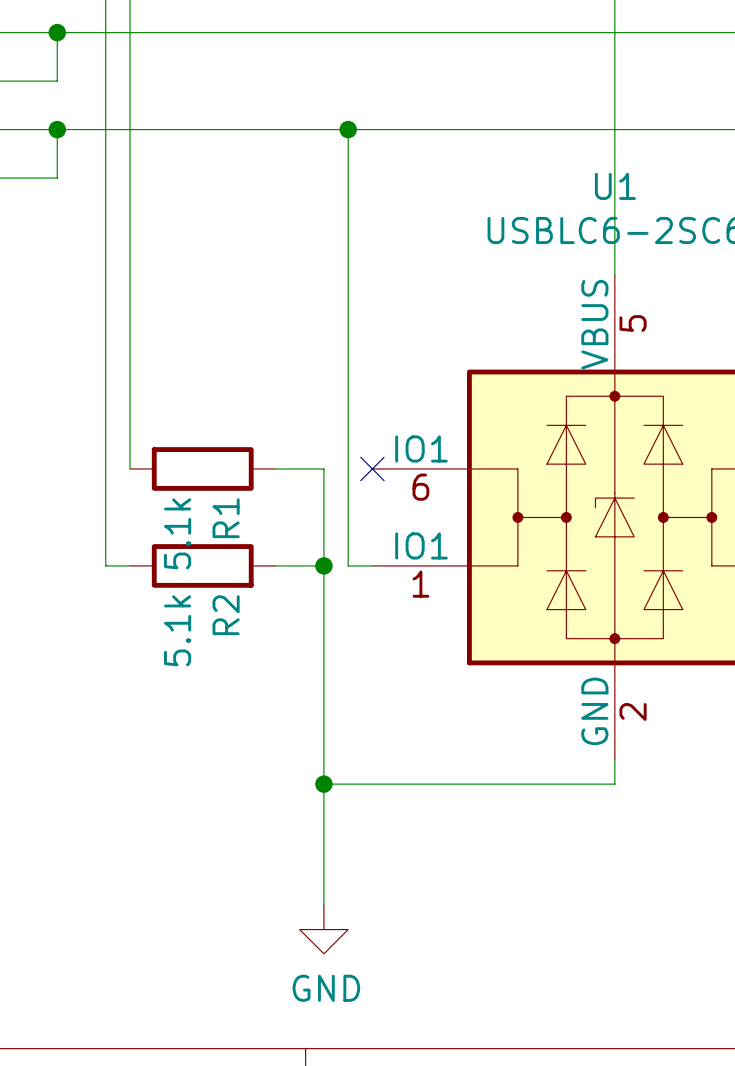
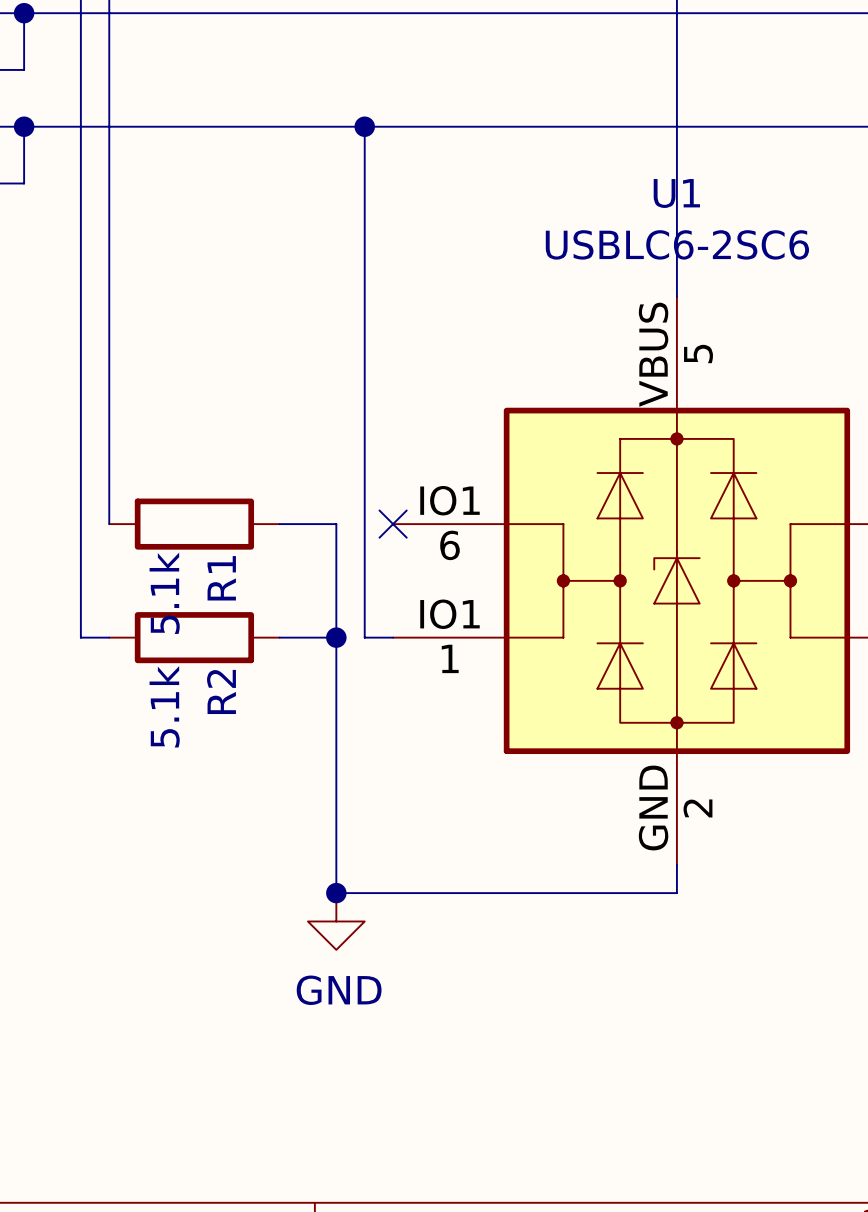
wire: (323, 784) (323, 905) -> none
power symbol position: GND (323, 929) -> GND (336, 921)

